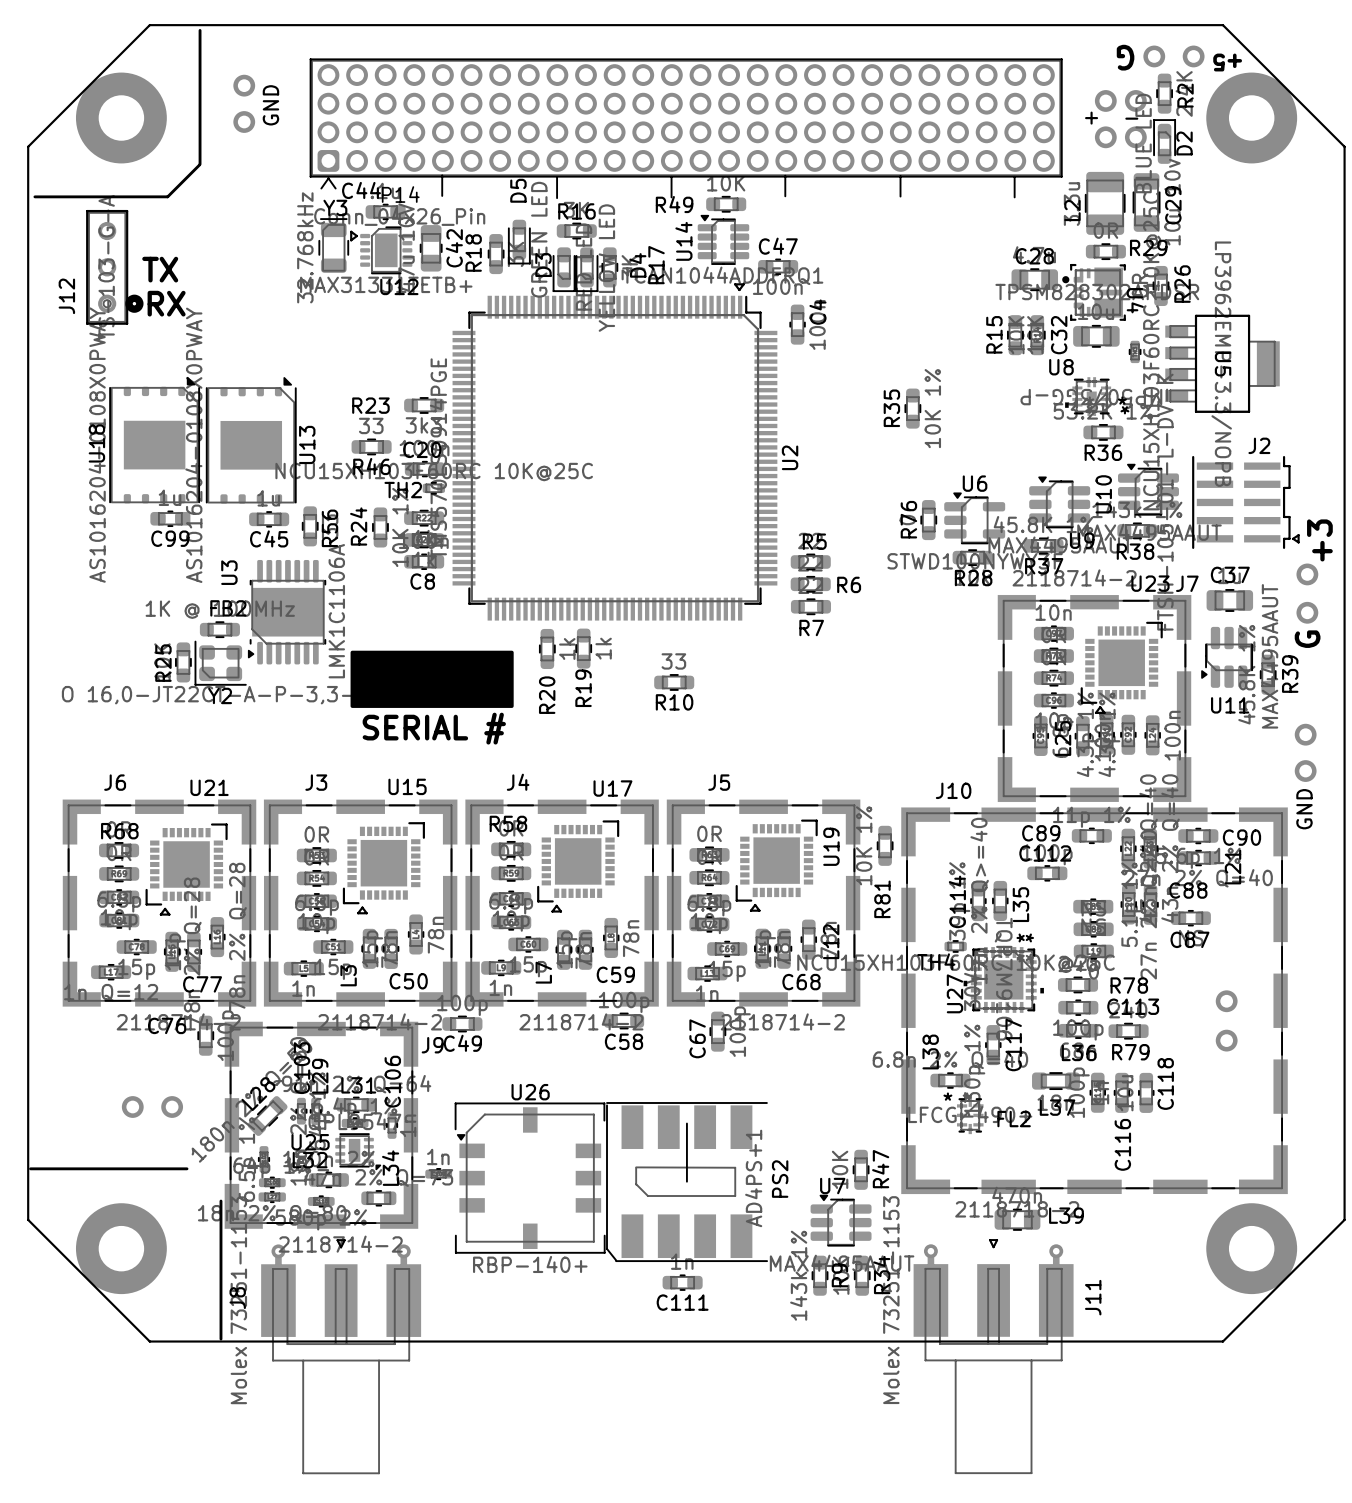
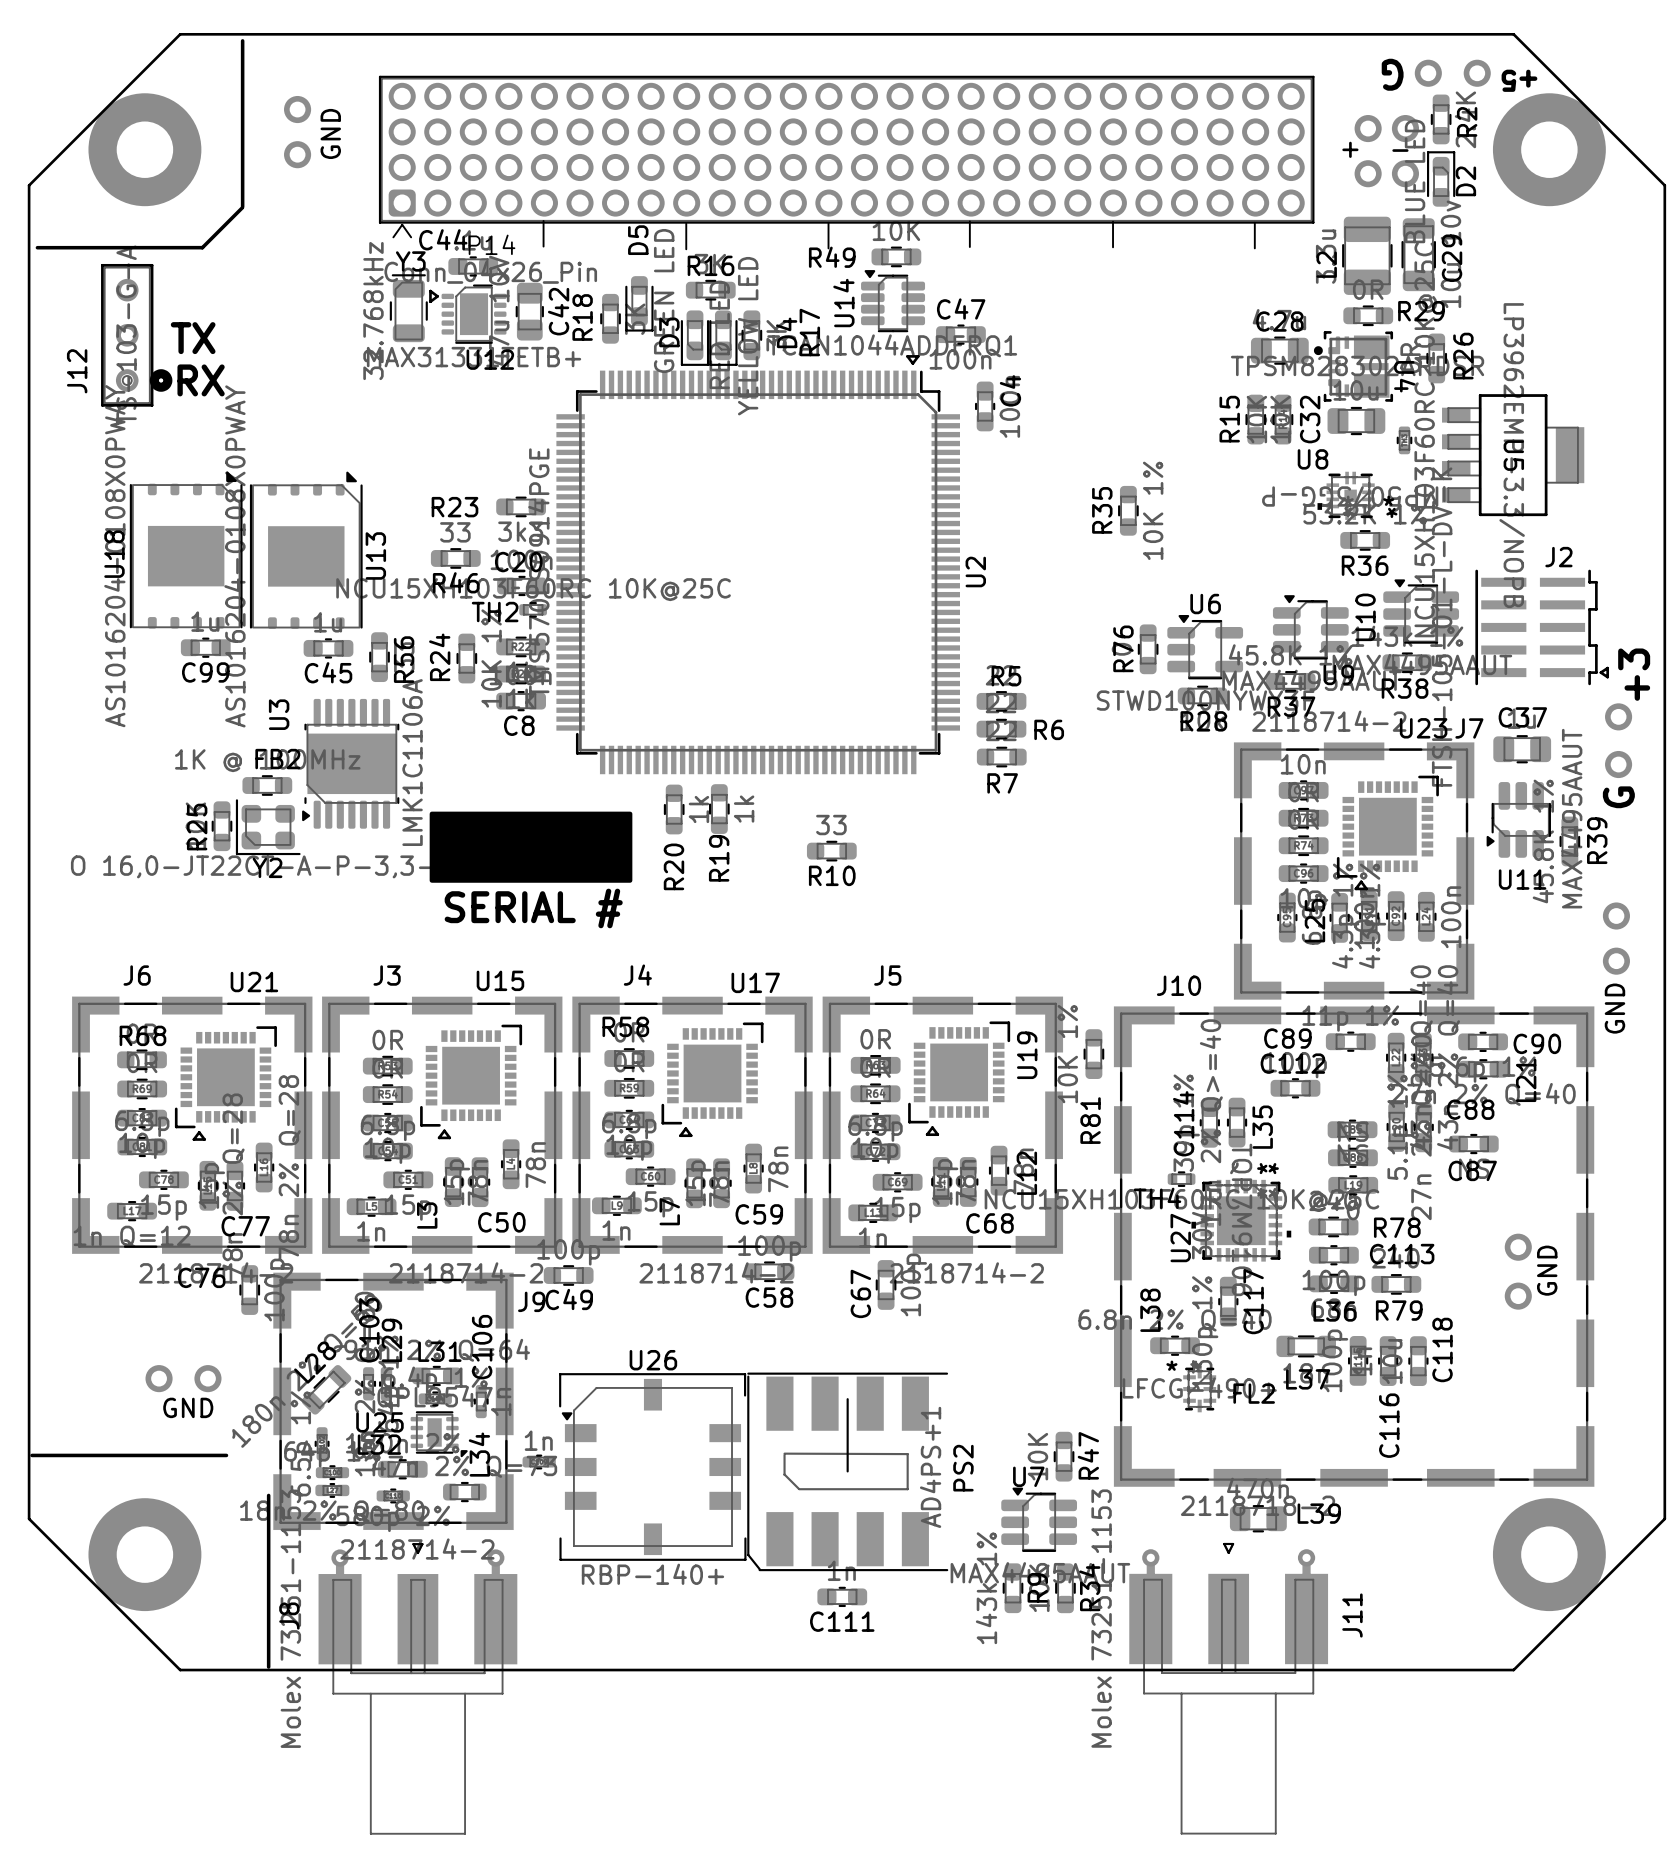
text: none -> GND (1547, 1270)
text: none -> GND (188, 1407)

